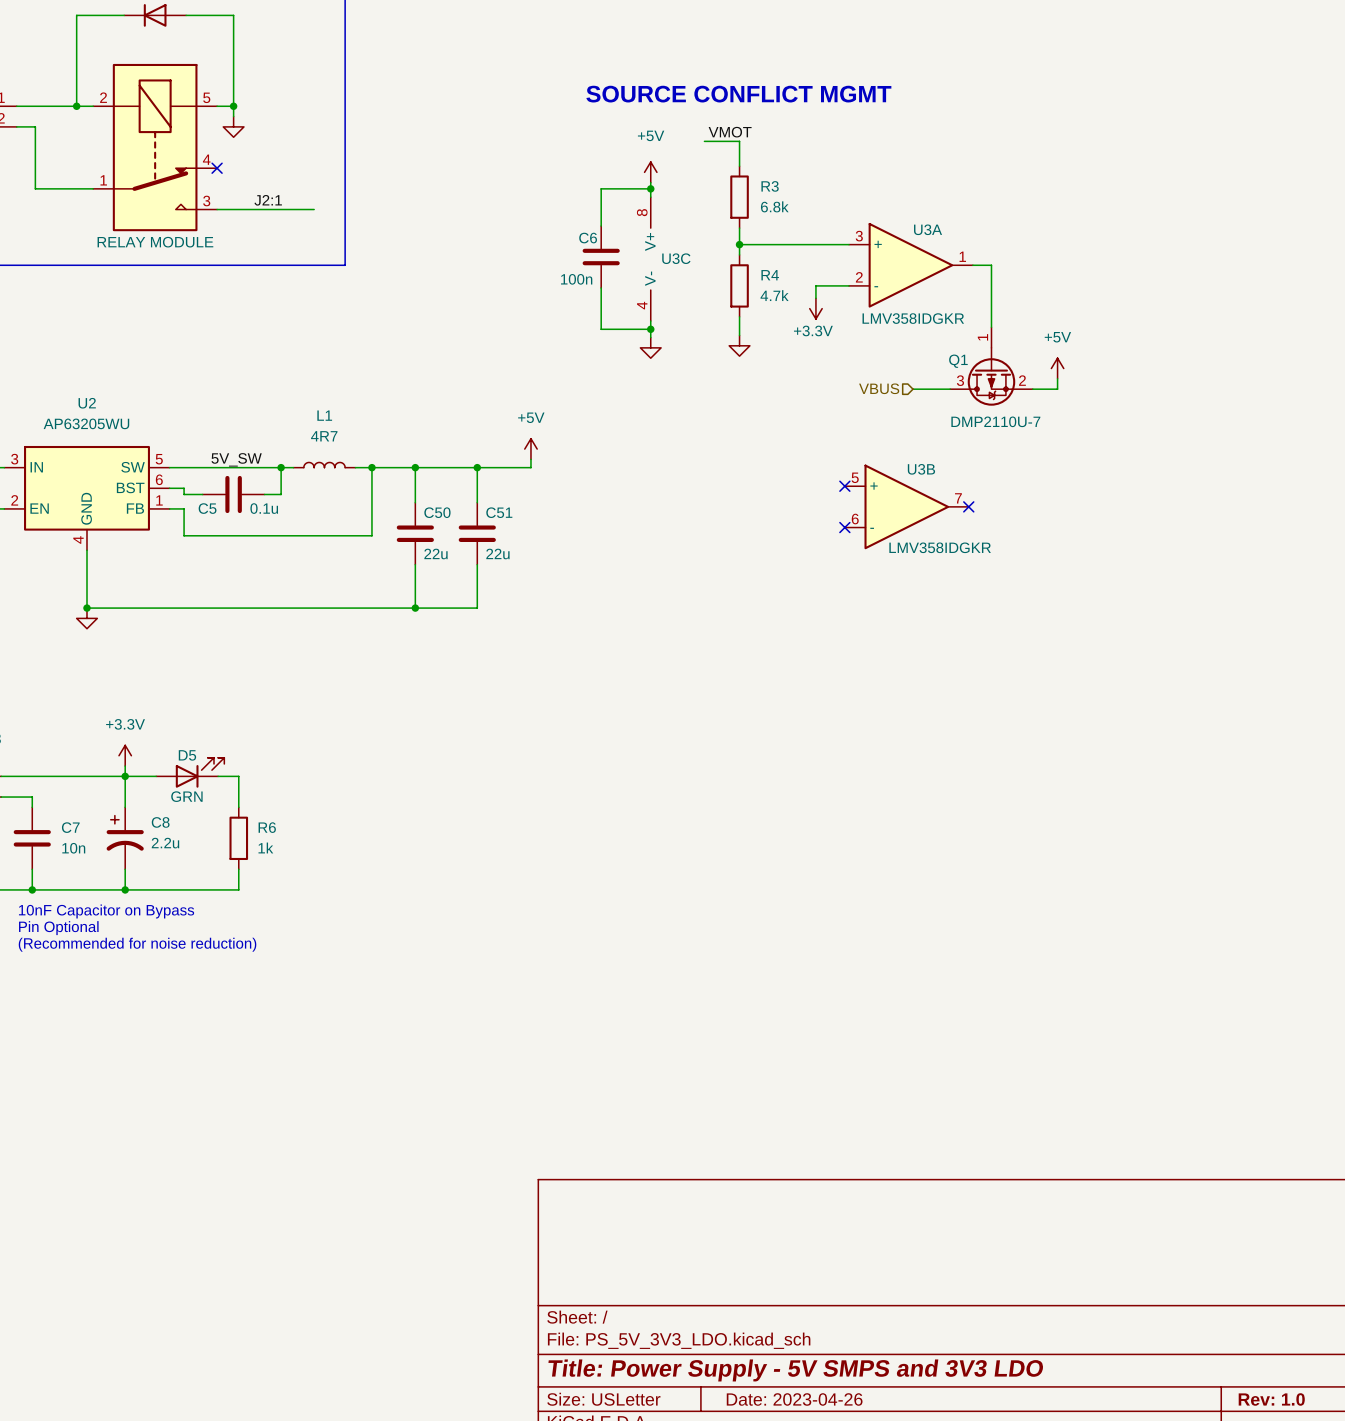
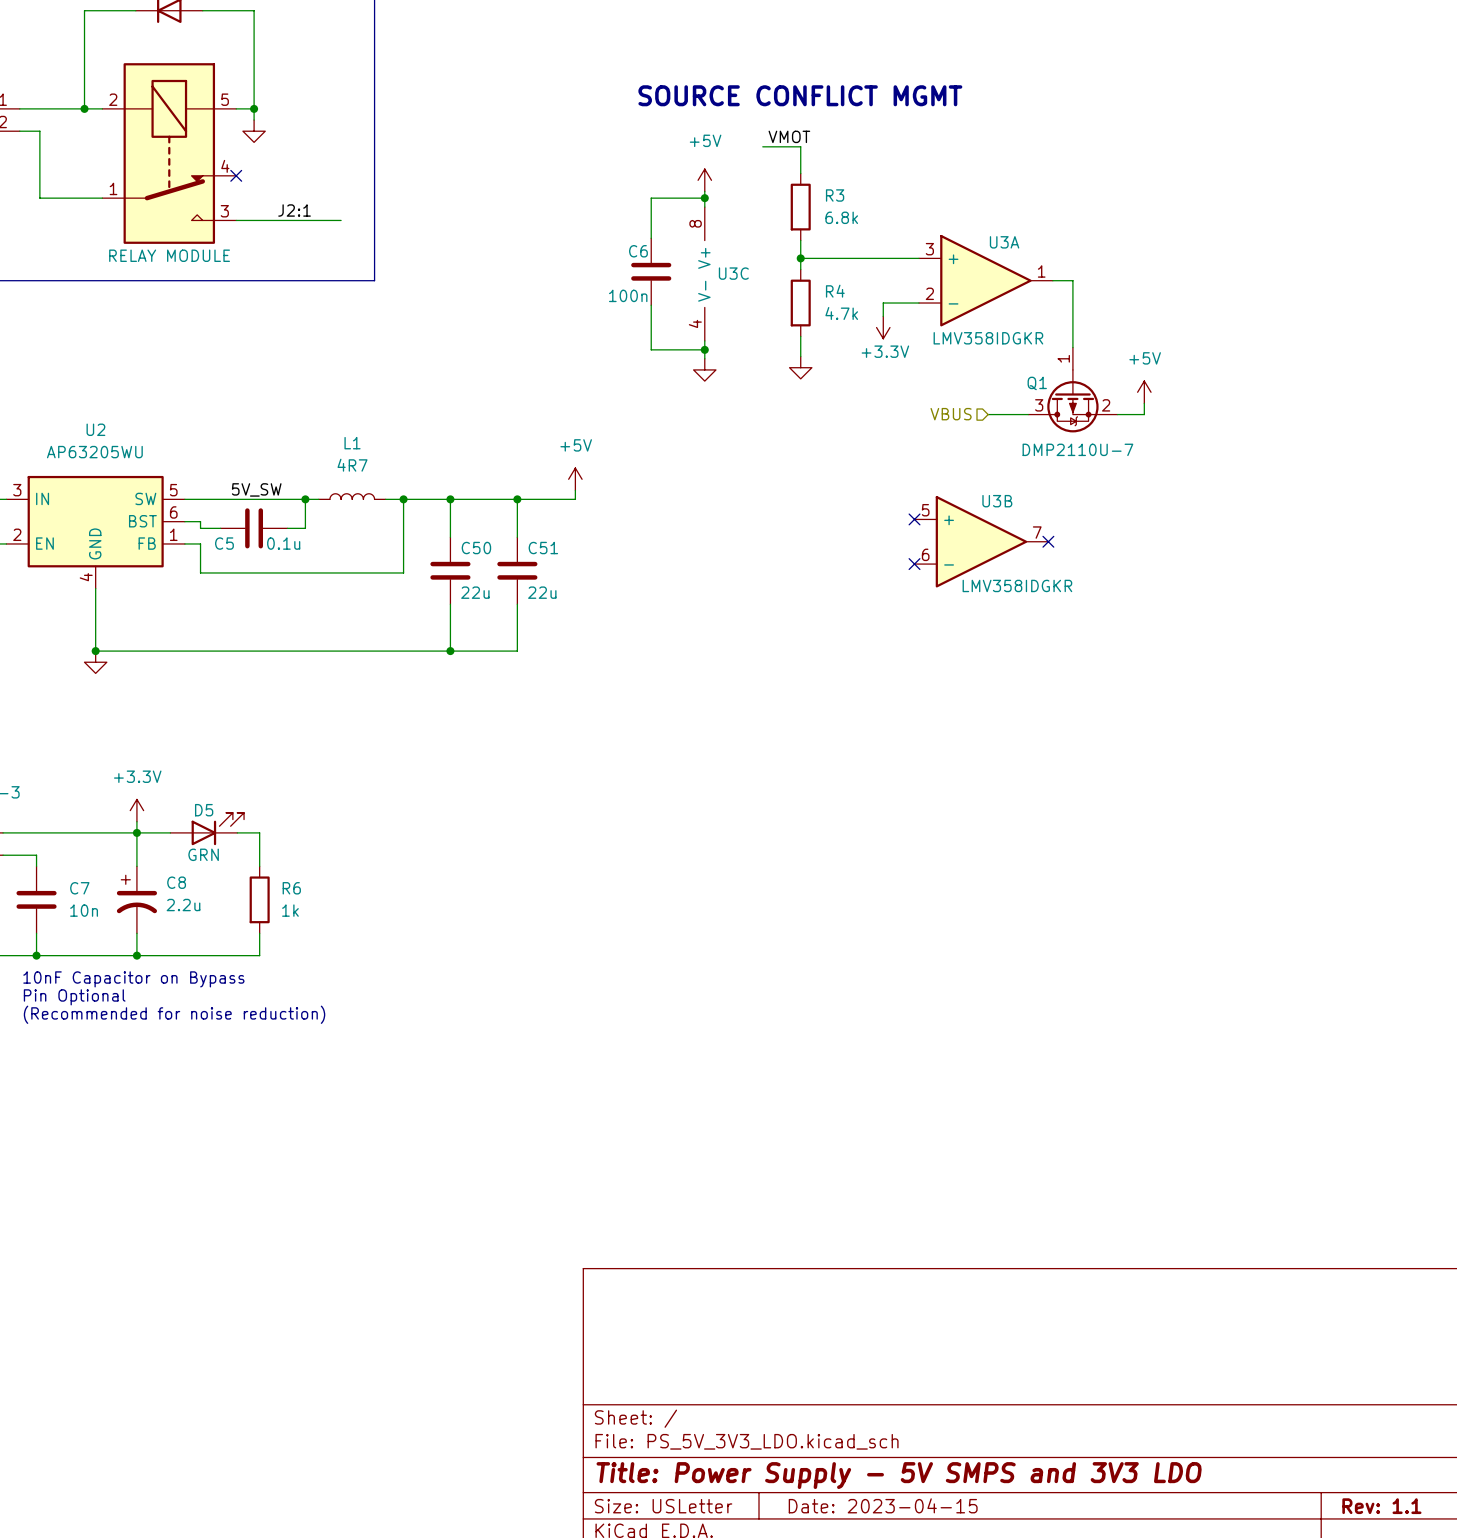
title block: Date: 2023-04-26 (794, 1399) -> Date: 2023-04-15 (883, 1505)
title block: Rev: 1.0 (1271, 1399) -> Rev: 1.1 (1381, 1506)

